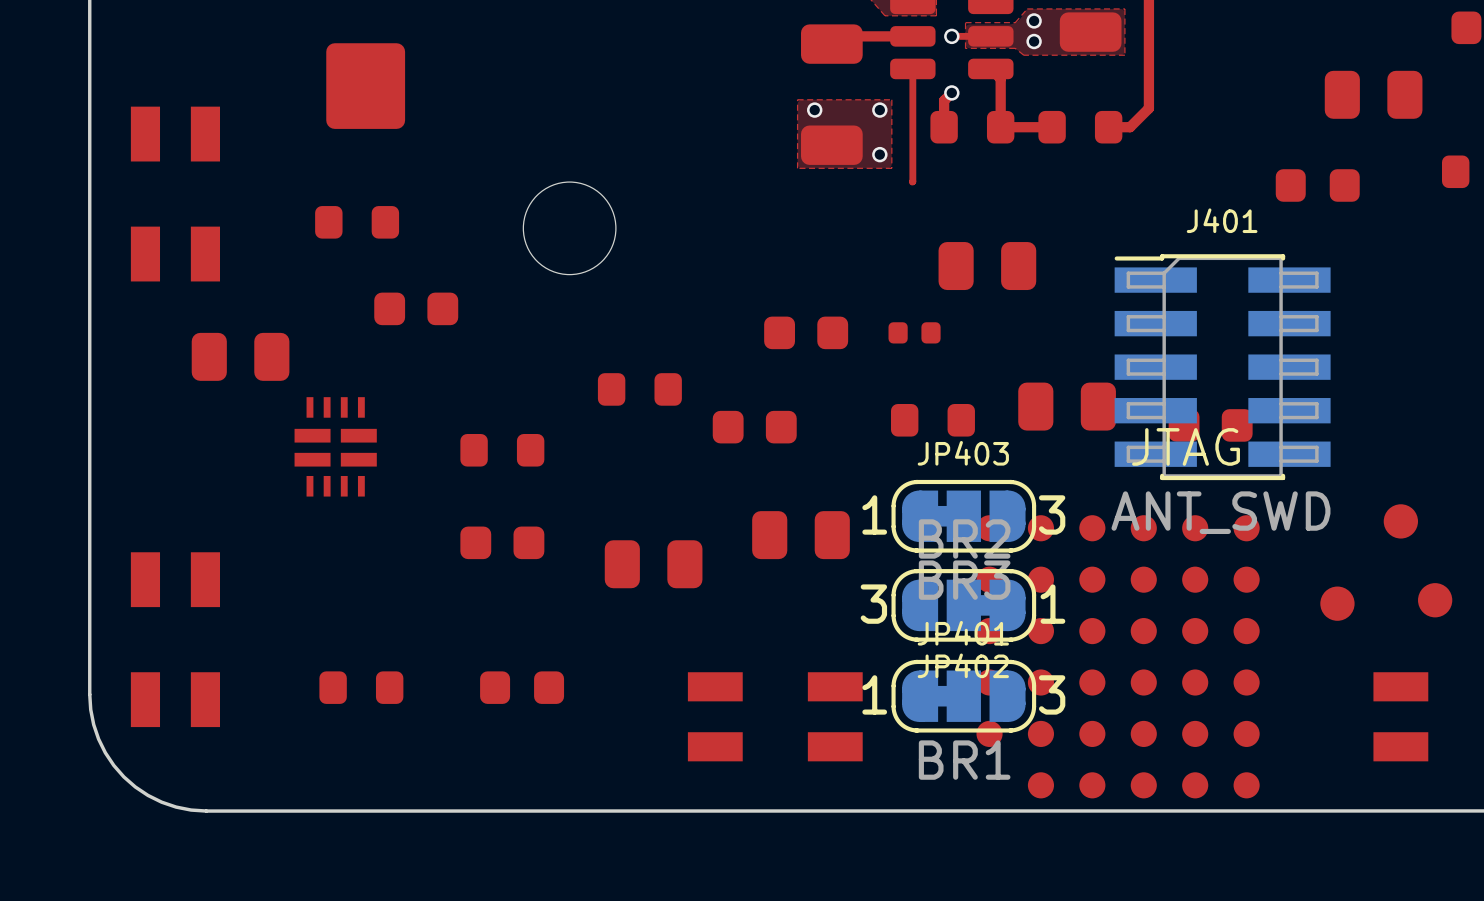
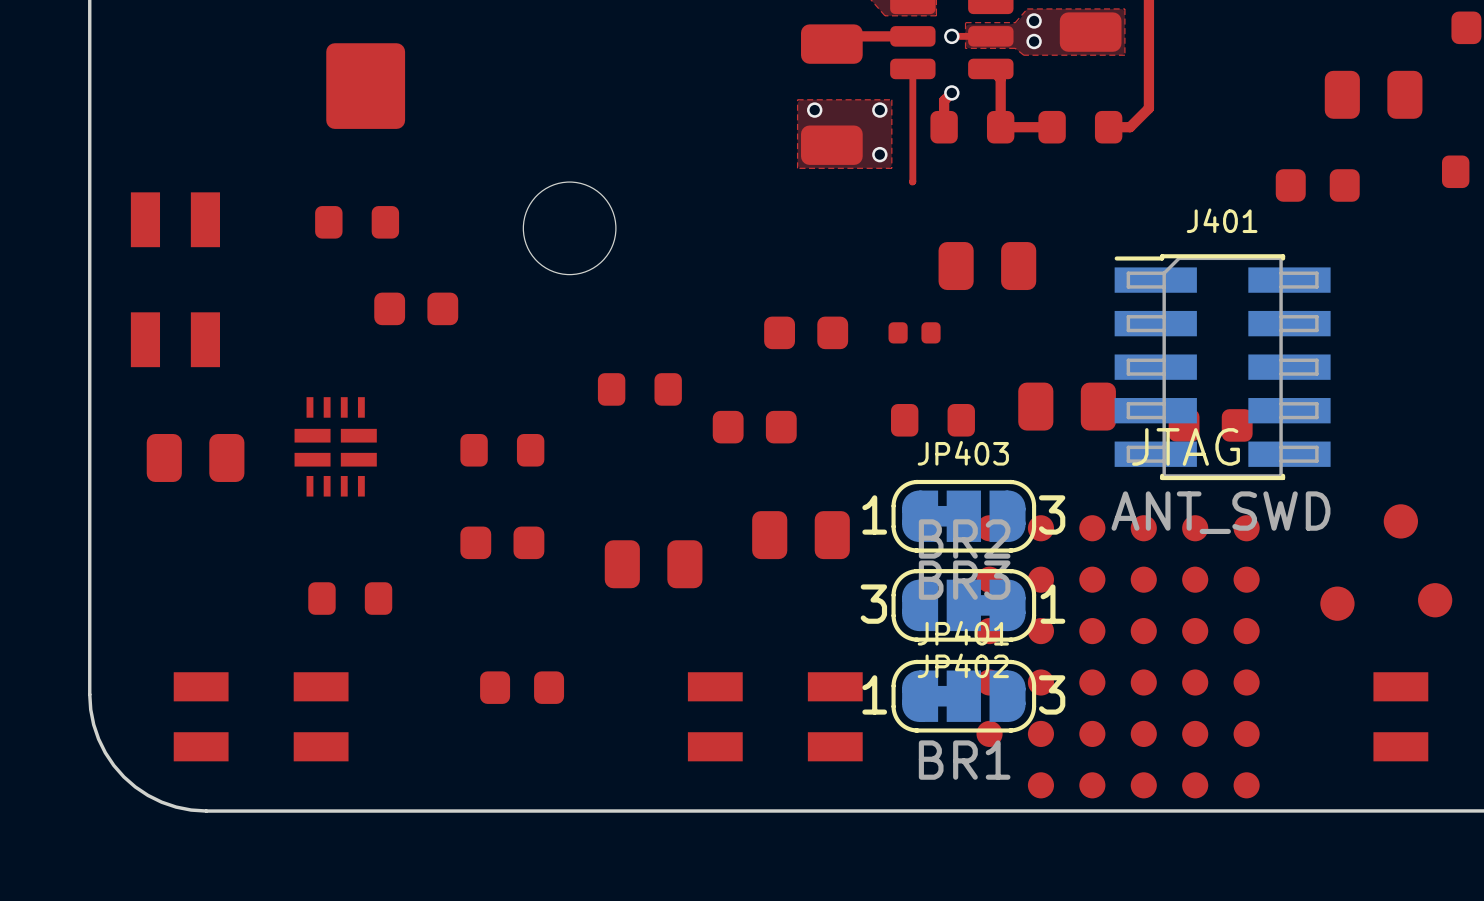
part position: (175, 194) -> (175, 279)
part position: (240, 356) -> (195, 457)
part rotation: 0° (175, 639) -> 90° clockwise (261, 716)
part position: (175, 639) -> (261, 716)
part position: (361, 687) -> (350, 598)

